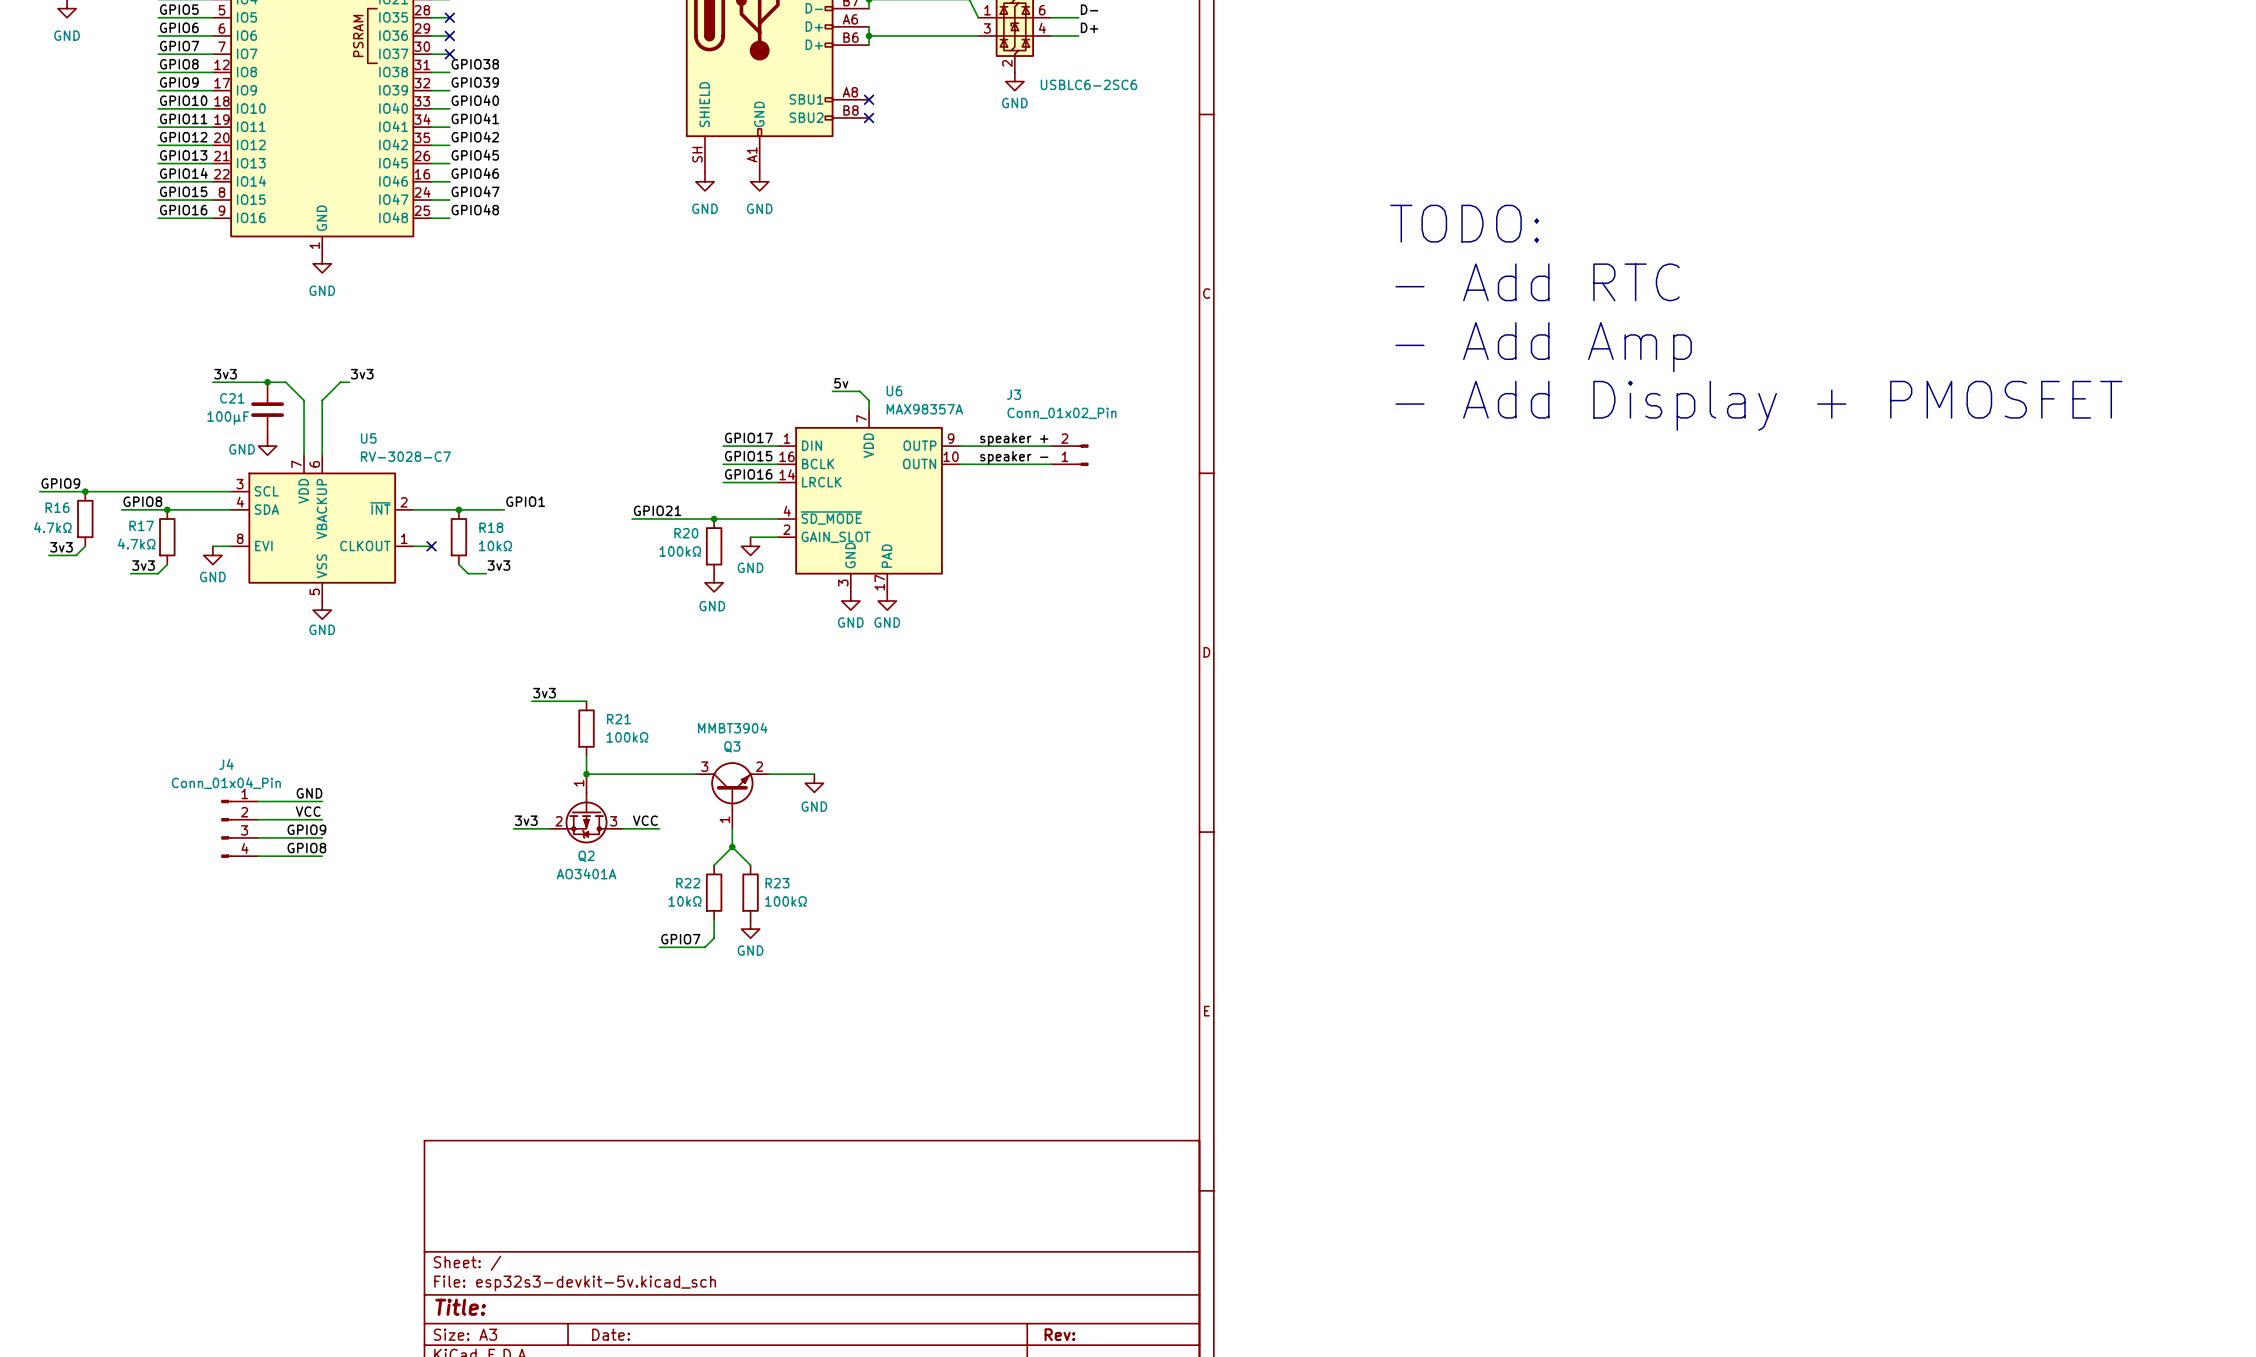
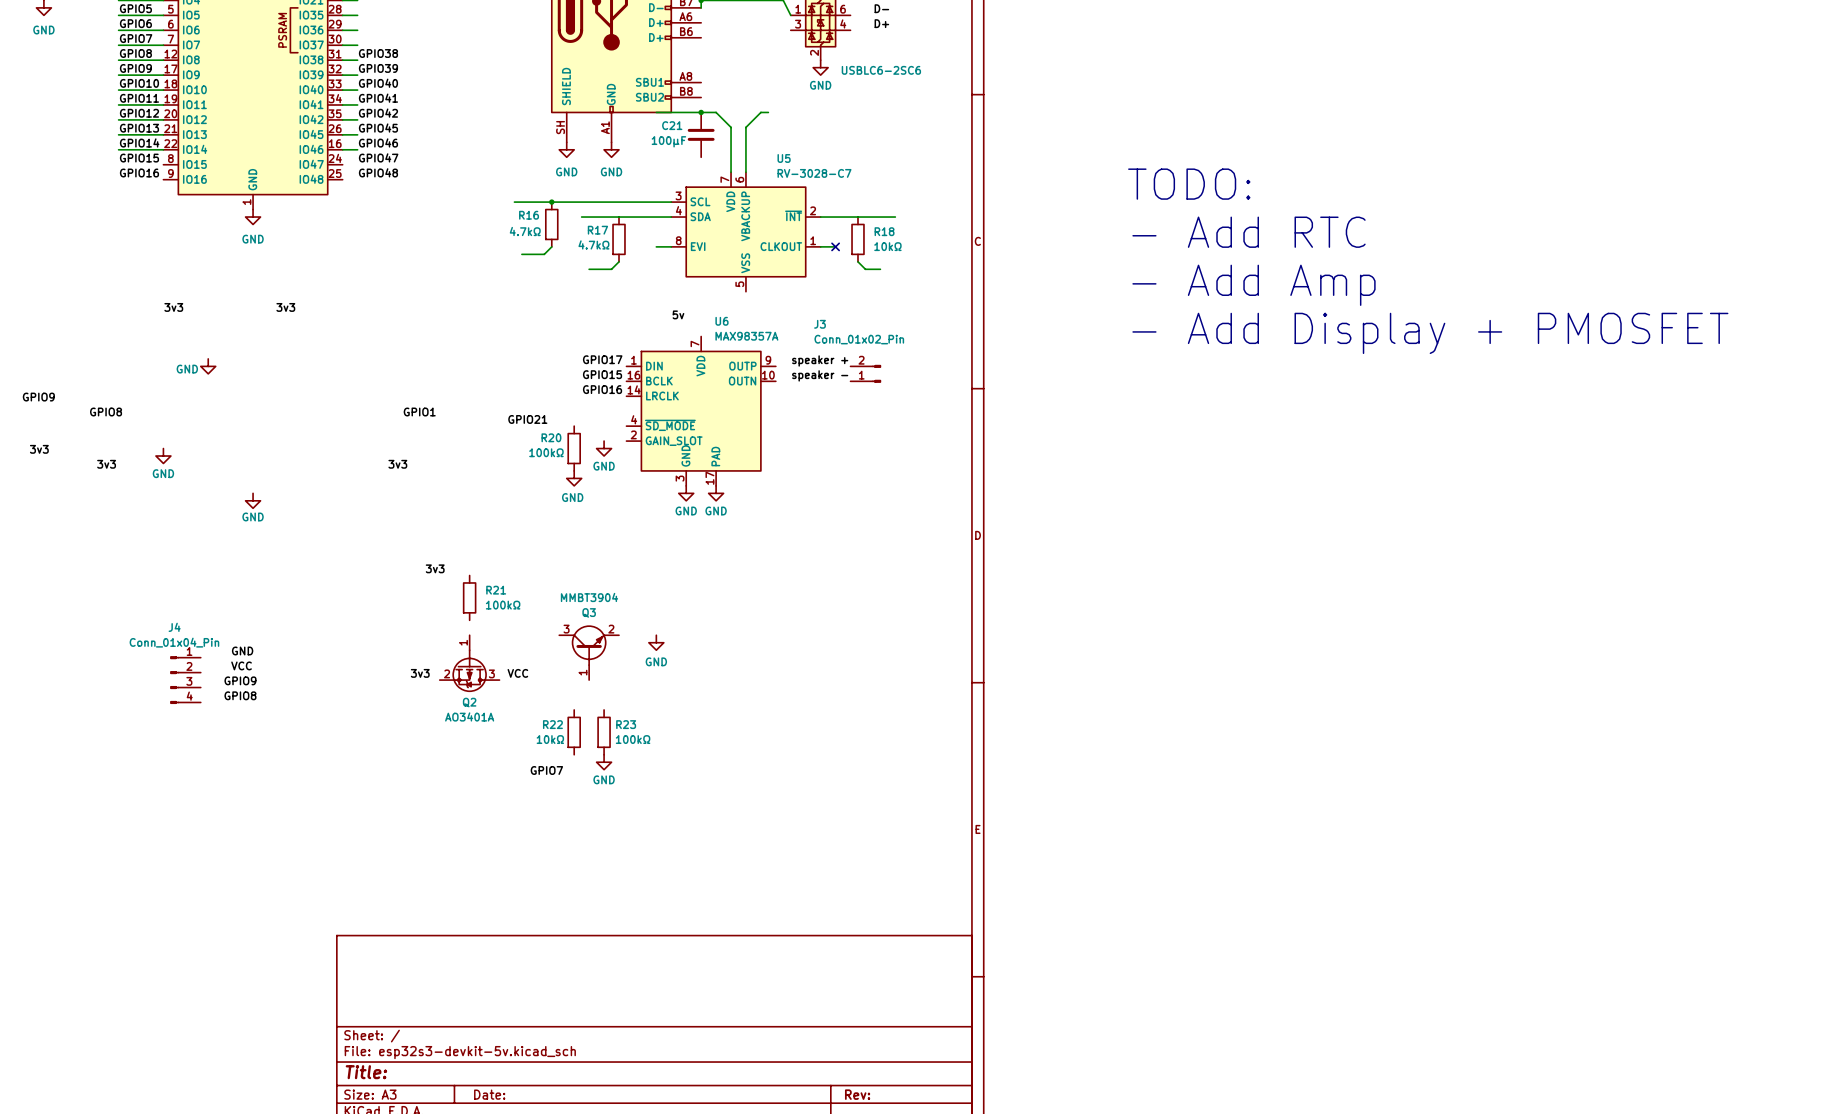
no-connect mark: (449, 17) -> none
wire: (1051, 17) (1078, 17) -> none
wire: (869, 26) (869, 45) -> none
no-connect mark: (449, 35) -> none
wire: (869, 35) (978, 35) -> none
junction: (869, 35) -> none
wire: (1051, 35) (1078, 35) -> none
no-connect mark: (449, 54) -> none
no-connect mark: (869, 99) -> none
no-connect mark: (869, 118) -> none
wire: none -> (656, 112) (716, 112) (731, 127) (731, 172)
junction: none -> (701, 112)
wire: none -> (768, 112) (760, 112) (745, 127) (745, 172)
wire: (158, 200) (212, 200) -> none
wire: (431, 200) (449, 200) -> none
wire: (158, 218) (212, 218) -> none
wire: (431, 218) (449, 218) -> none
wire: none -> (514, 202) (671, 202)
junction: none -> (551, 202)
wire: none -> (581, 217) (671, 217)
wire: none -> (820, 217) (895, 217)
wire: none -> (551, 246) (544, 254) (521, 254)
wire: none -> (656, 246) (671, 246)
wire: none -> (820, 246) (835, 246)
no-connect mark: none -> (835, 246)
wire: none -> (619, 261) (611, 269) (589, 269)
wire: none -> (857, 261) (865, 269) (880, 269)
wire: (212, 382) (285, 382) (304, 400) (304, 455) -> none
junction: (267, 382) -> none
wire: (349, 382) (340, 382) (322, 400) (322, 455) -> none
wire: (832, 391) (859, 391) (869, 400) (869, 409) -> none
C21 position: (267, 409) -> (701, 134)
wire: (723, 446) (777, 446) -> none
wire: (960, 446) (1051, 446) -> none
wire: (723, 464) (777, 464) -> none
wire: (960, 464) (1051, 464) -> none
wire: (723, 482) (777, 482) -> none
wire: (39, 491) (231, 491) -> none
junction: (85, 491) -> none
wire: (121, 509) (231, 509) -> none
junction: (167, 509) -> none
wire: (413, 509) (504, 509) -> none
junction: (458, 509) -> none
R16 position: (85, 518) -> (551, 224)
wire: (632, 518) (777, 518) -> none
junction: (714, 518) -> none
U5 position: (322, 528) -> (745, 231)
R17 position: (167, 537) -> (619, 239)
R18 position: (458, 537) -> (857, 239)
wire: (750, 537) (777, 537) -> none
wire: (85, 546) (76, 555) (48, 555) -> none
wire: (212, 546) (231, 546) -> none
wire: (413, 546) (431, 546) -> none
no-connect mark: (431, 546) -> none
wire: (167, 564) (158, 573) (130, 573) -> none
wire: (458, 564) (468, 573) (486, 573) -> none
wire: (531, 701) (586, 701) -> none
wire: (586, 755) (586, 774) (695, 774) -> none
junction: (586, 774) -> none
wire: (768, 774) (814, 774) -> none
wire: (258, 801) (322, 801) -> none
wire: (258, 819) (322, 819) -> none
wire: (513, 828) (550, 828) -> none
wire: (622, 828) (659, 828) -> none
wire: (732, 828) (732, 847) -> none
wire: (258, 837) (322, 837) -> none
wire: (732, 847) (714, 865) -> none
wire: (732, 847) (750, 865) -> none
junction: (732, 847) -> none
wire: (258, 856) (322, 856) -> none
wire: (714, 919) (714, 938) (705, 947) (659, 947) -> none

